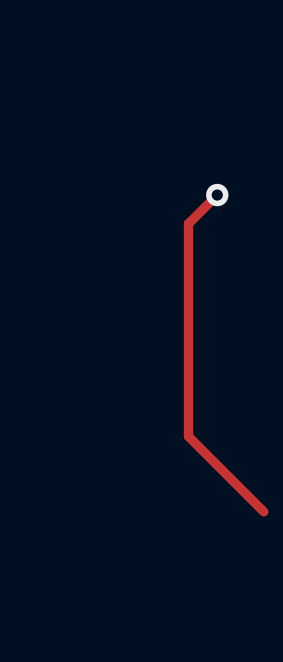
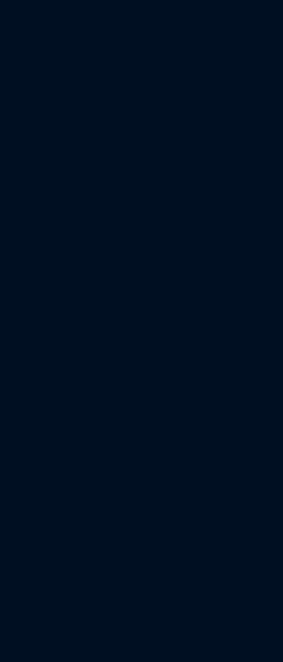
track: (217, 195) (188, 223) (188, 436) (263, 511) -> none
via: (217, 195) -> none

